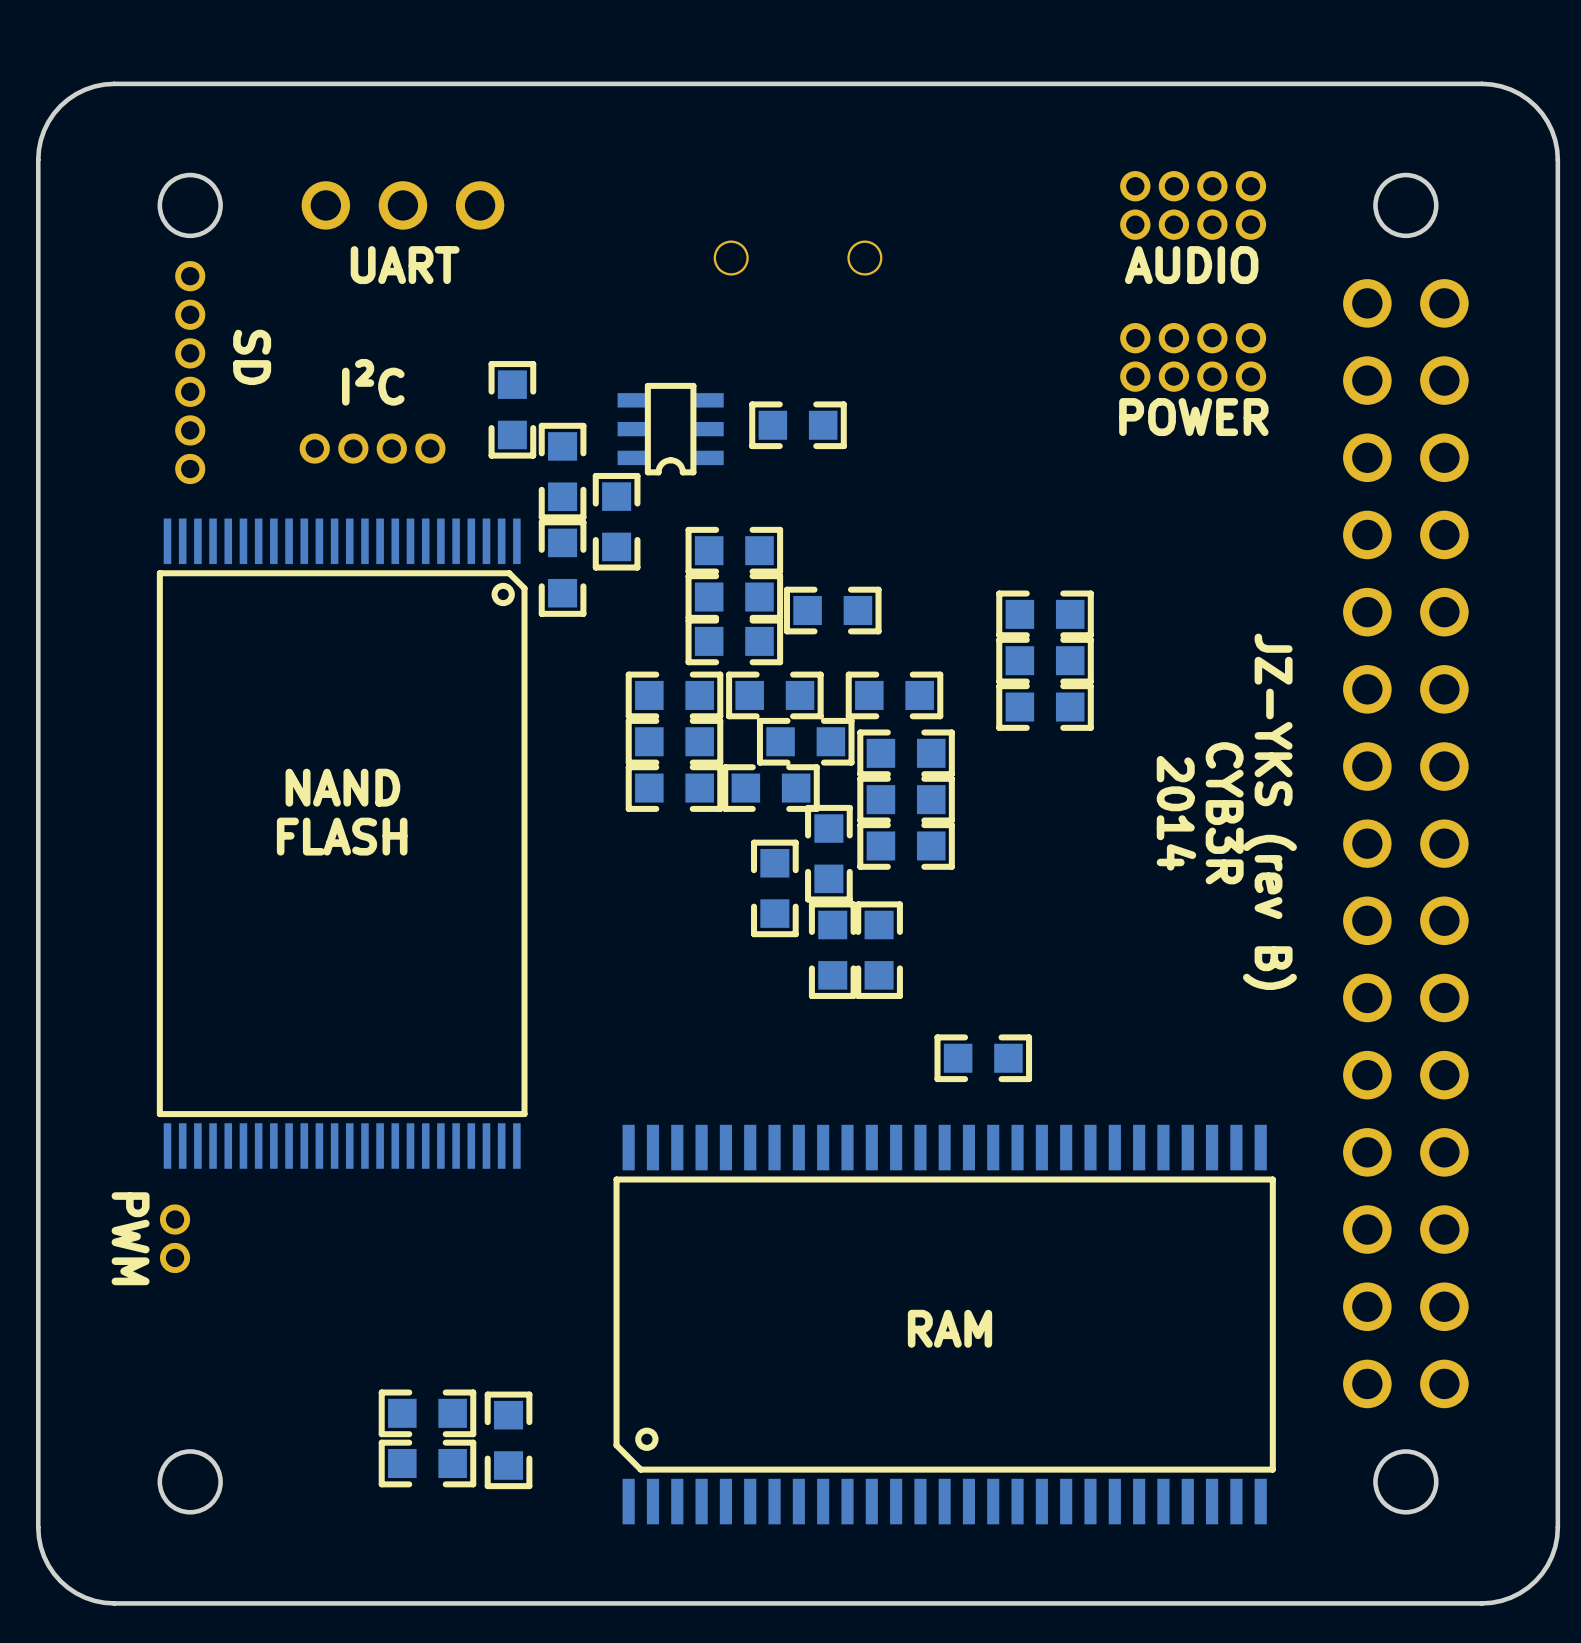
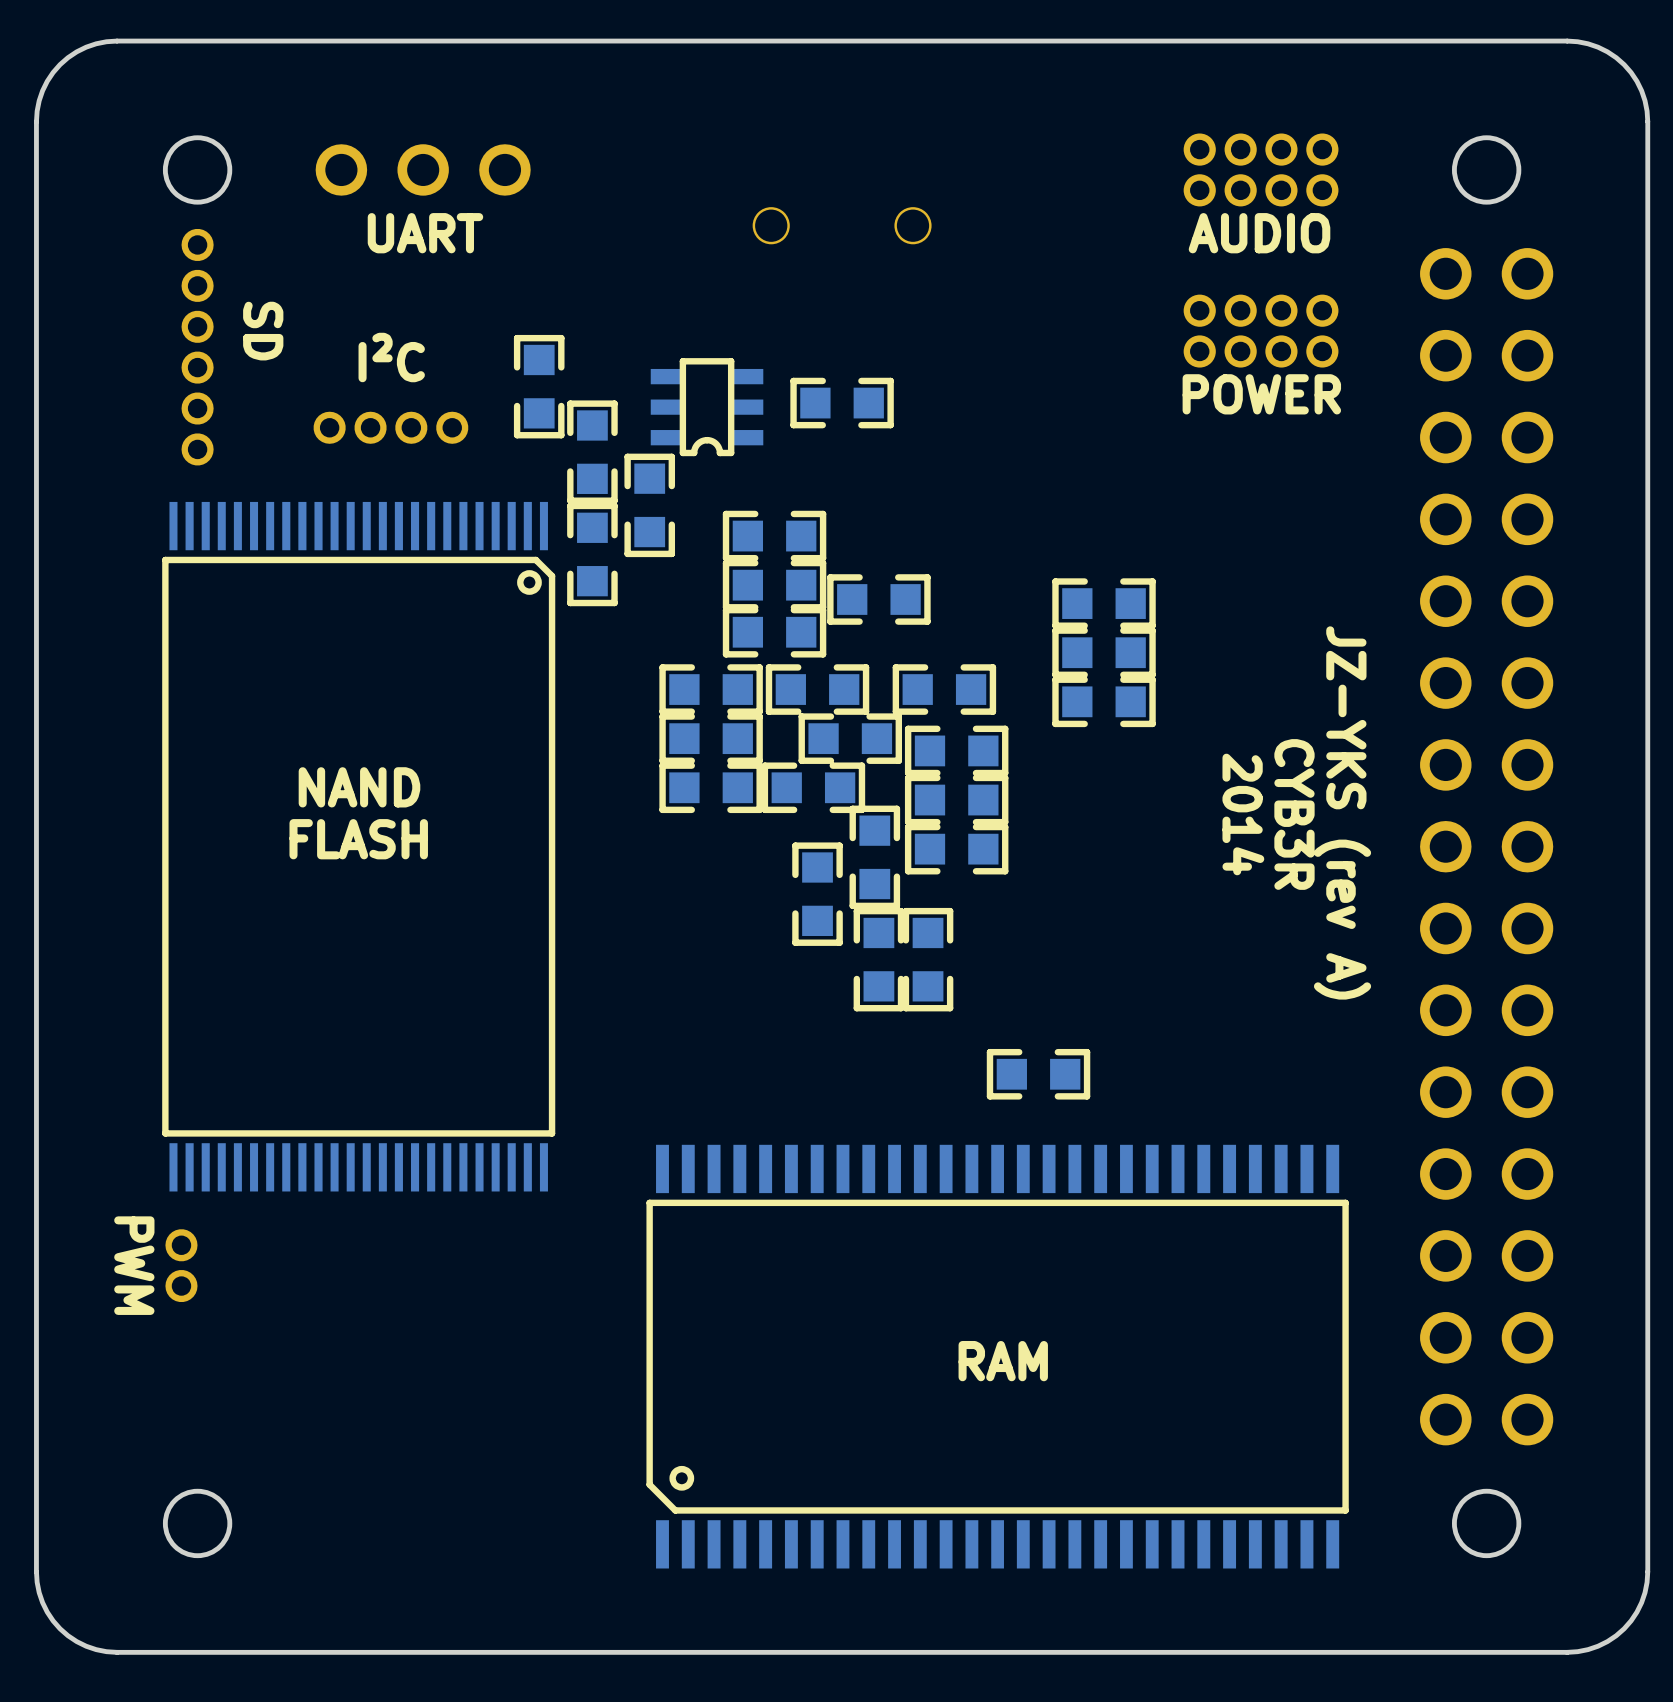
text: JZ-YKS (rev B) (1269, 811) -> JZ-YKS (rev A) (1342, 812)
part: (427, 1413) -> none
part: (508, 1440) -> none
part: (427, 1463) -> none

